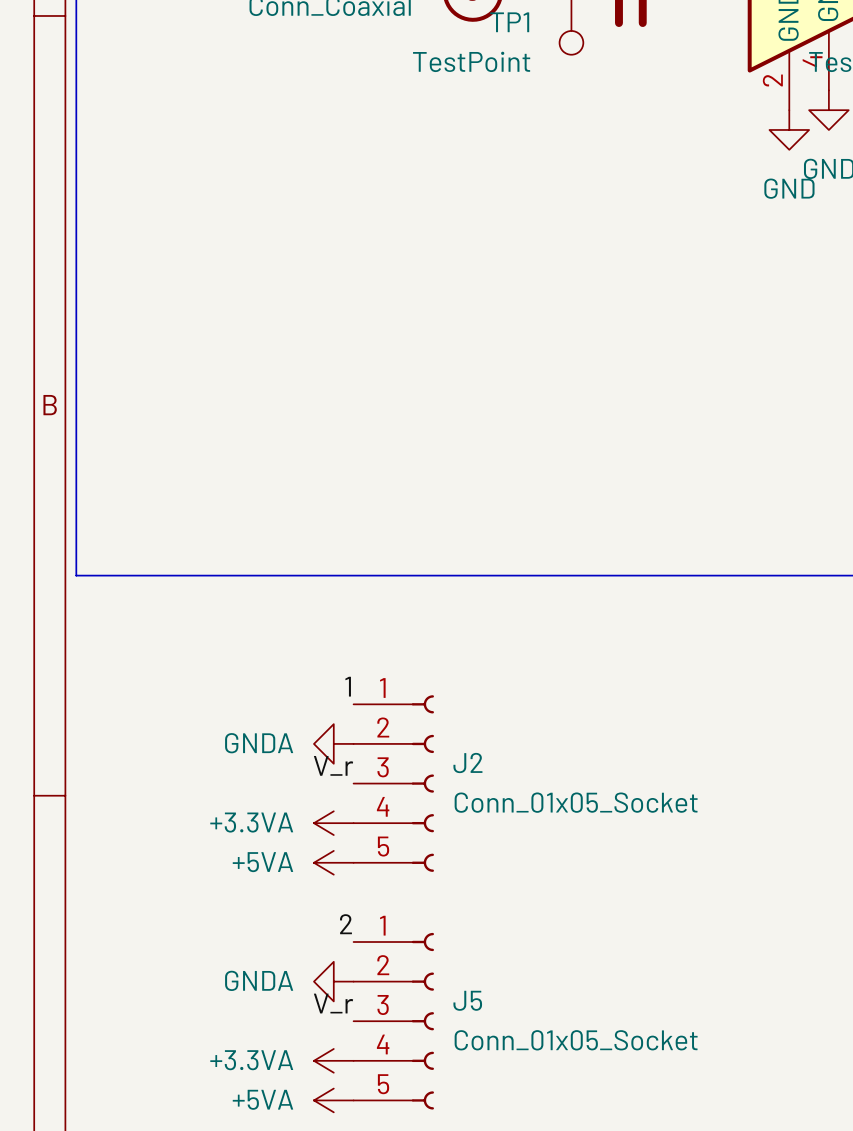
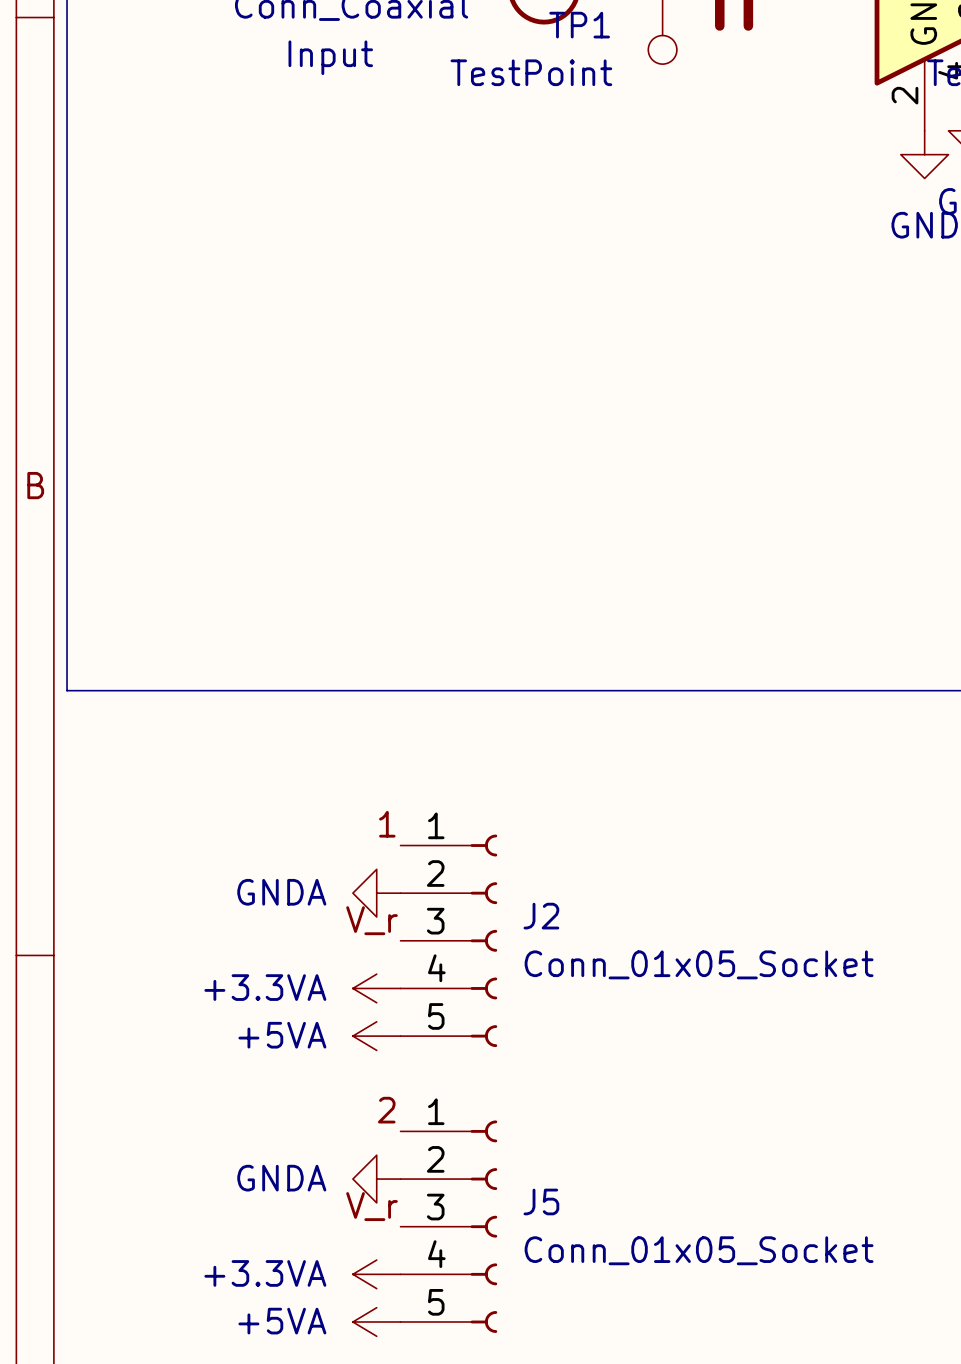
text: none -> Input (330, 57)

